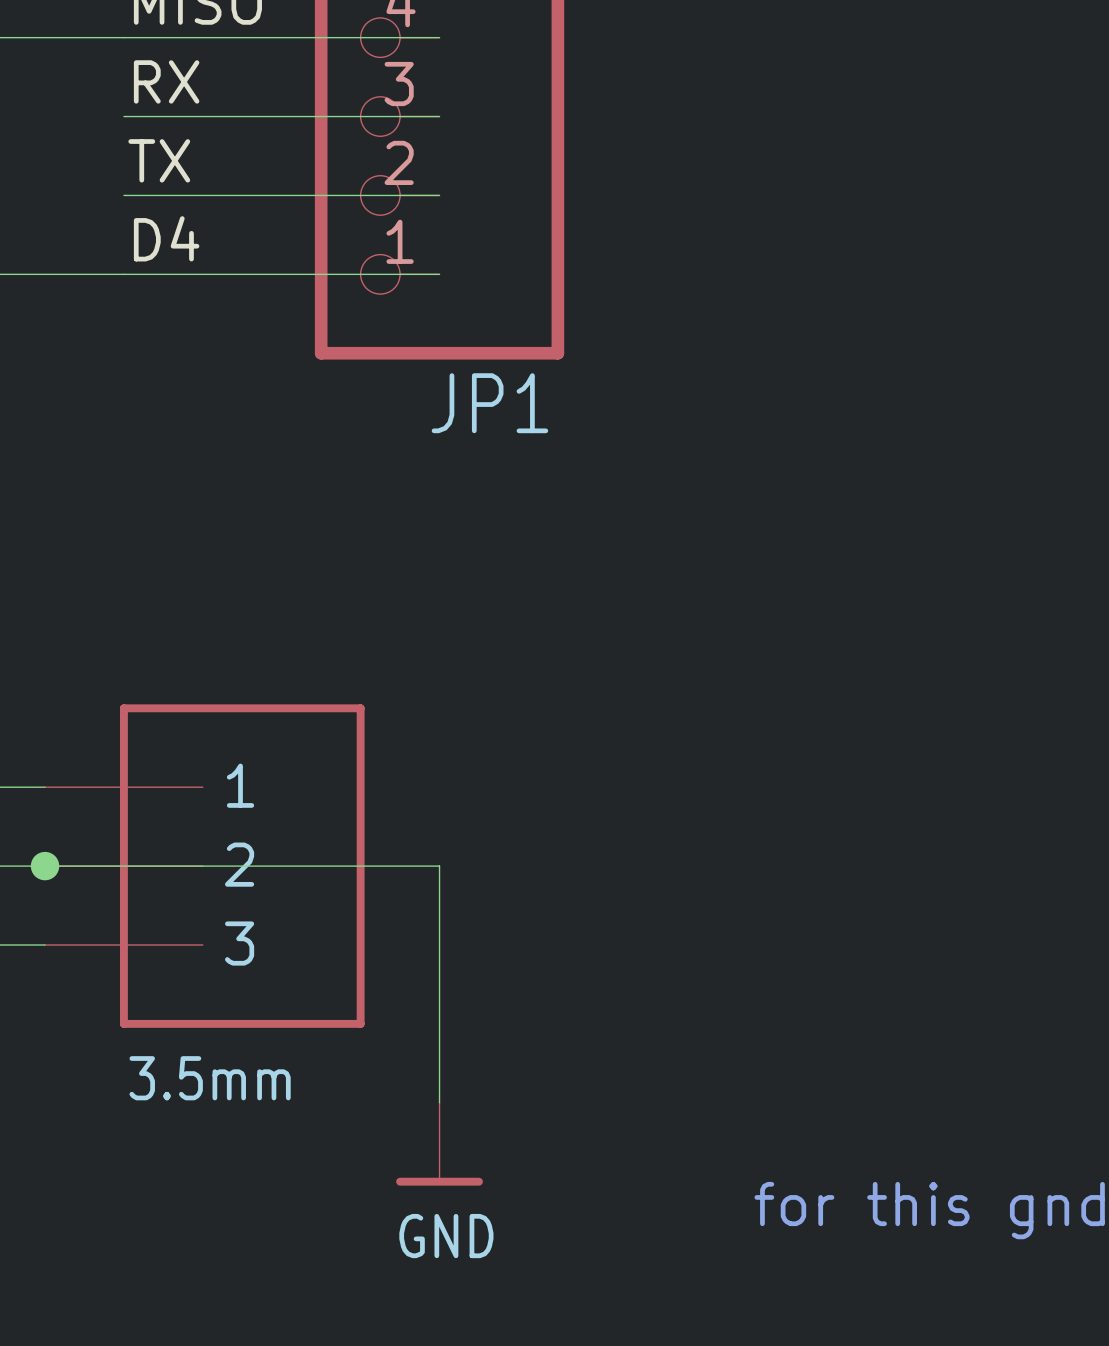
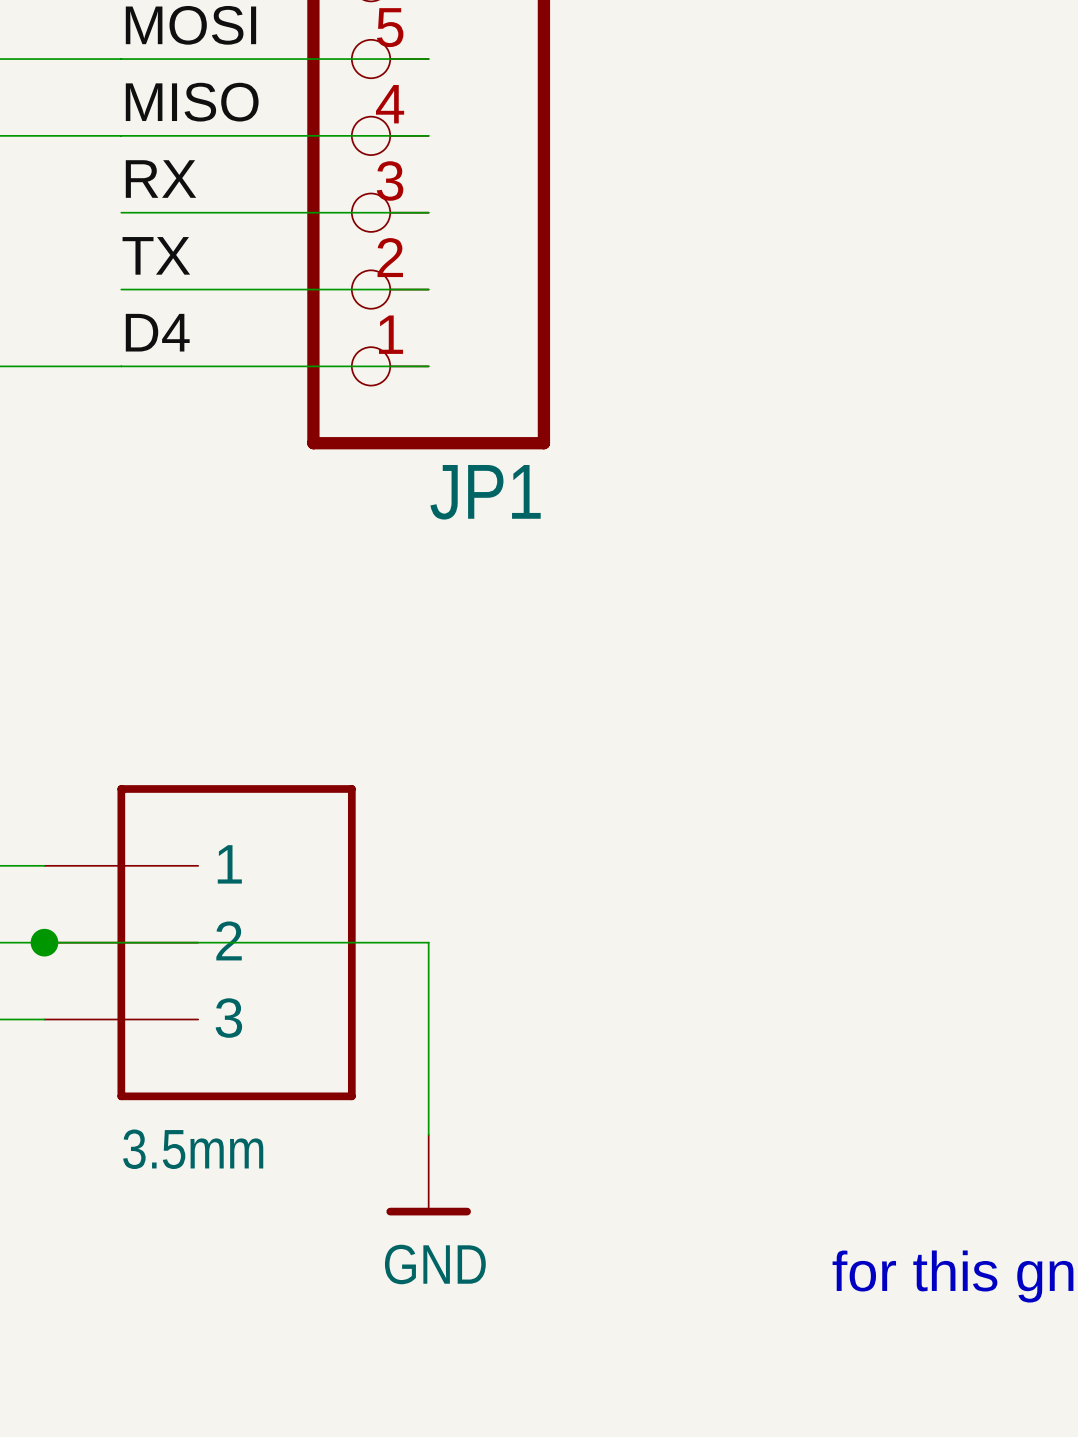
power symbol position: GND (439, 1144) -> GND (428, 1175)

